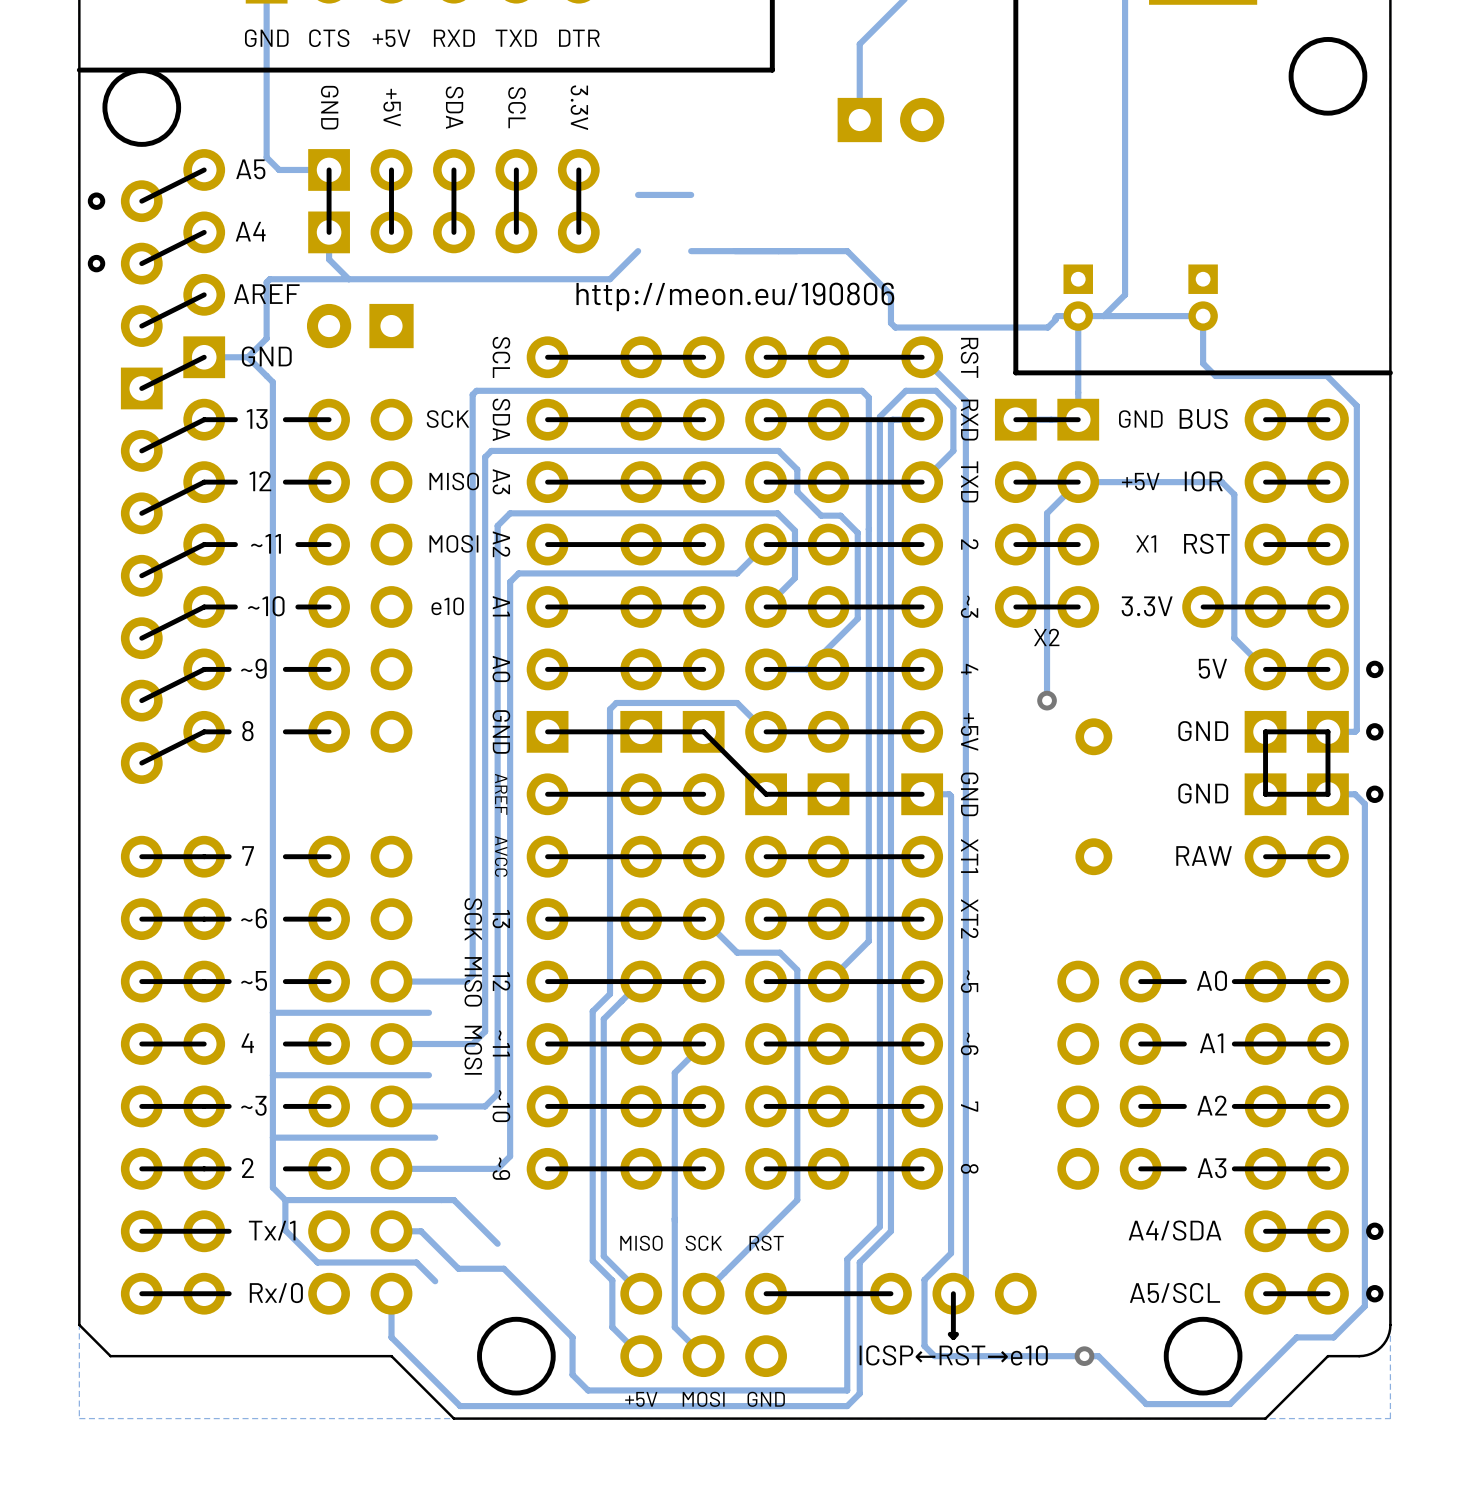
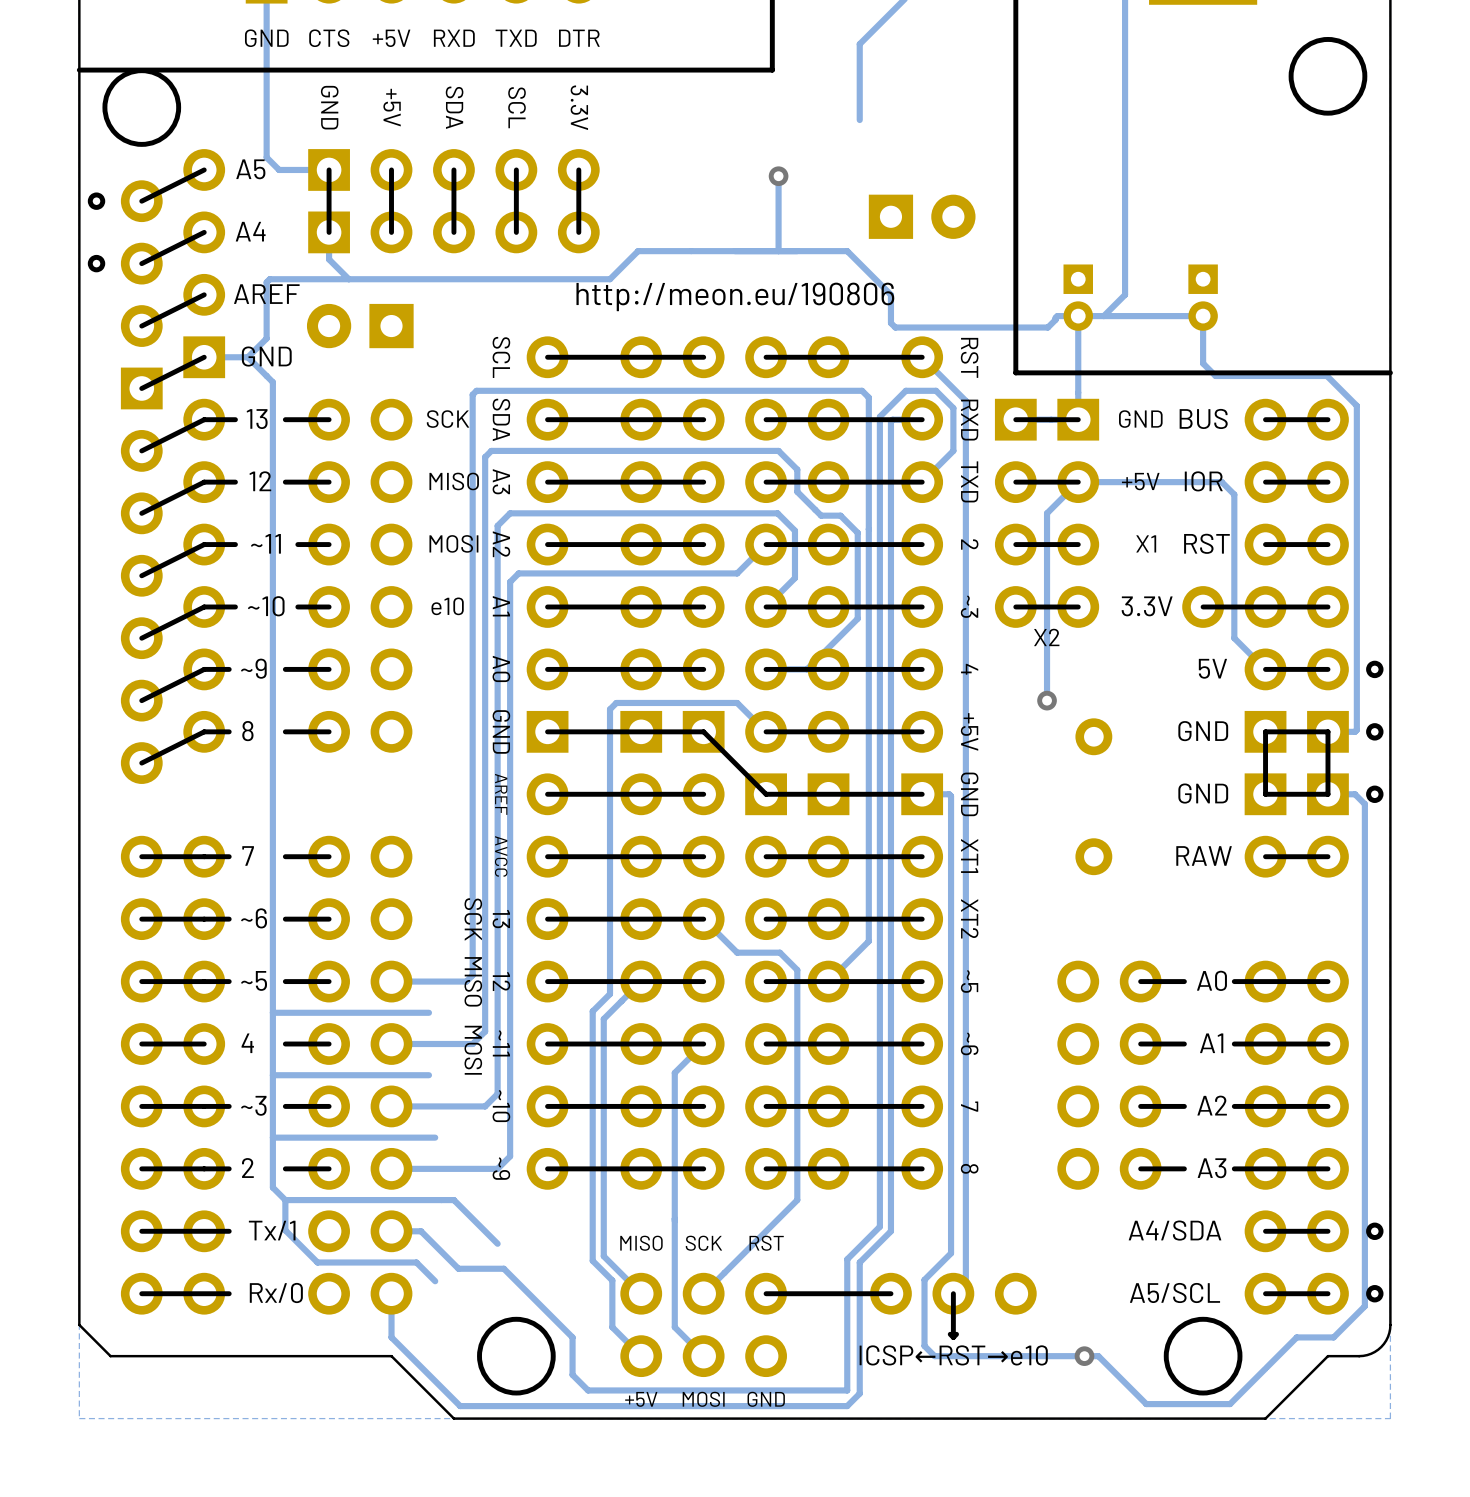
part position: (890, 120) -> (922, 216)
track: none -> (778, 176) (778, 251)
via: none -> (778, 176)
track: (691, 194) (638, 194) -> (691, 251) (638, 251)

